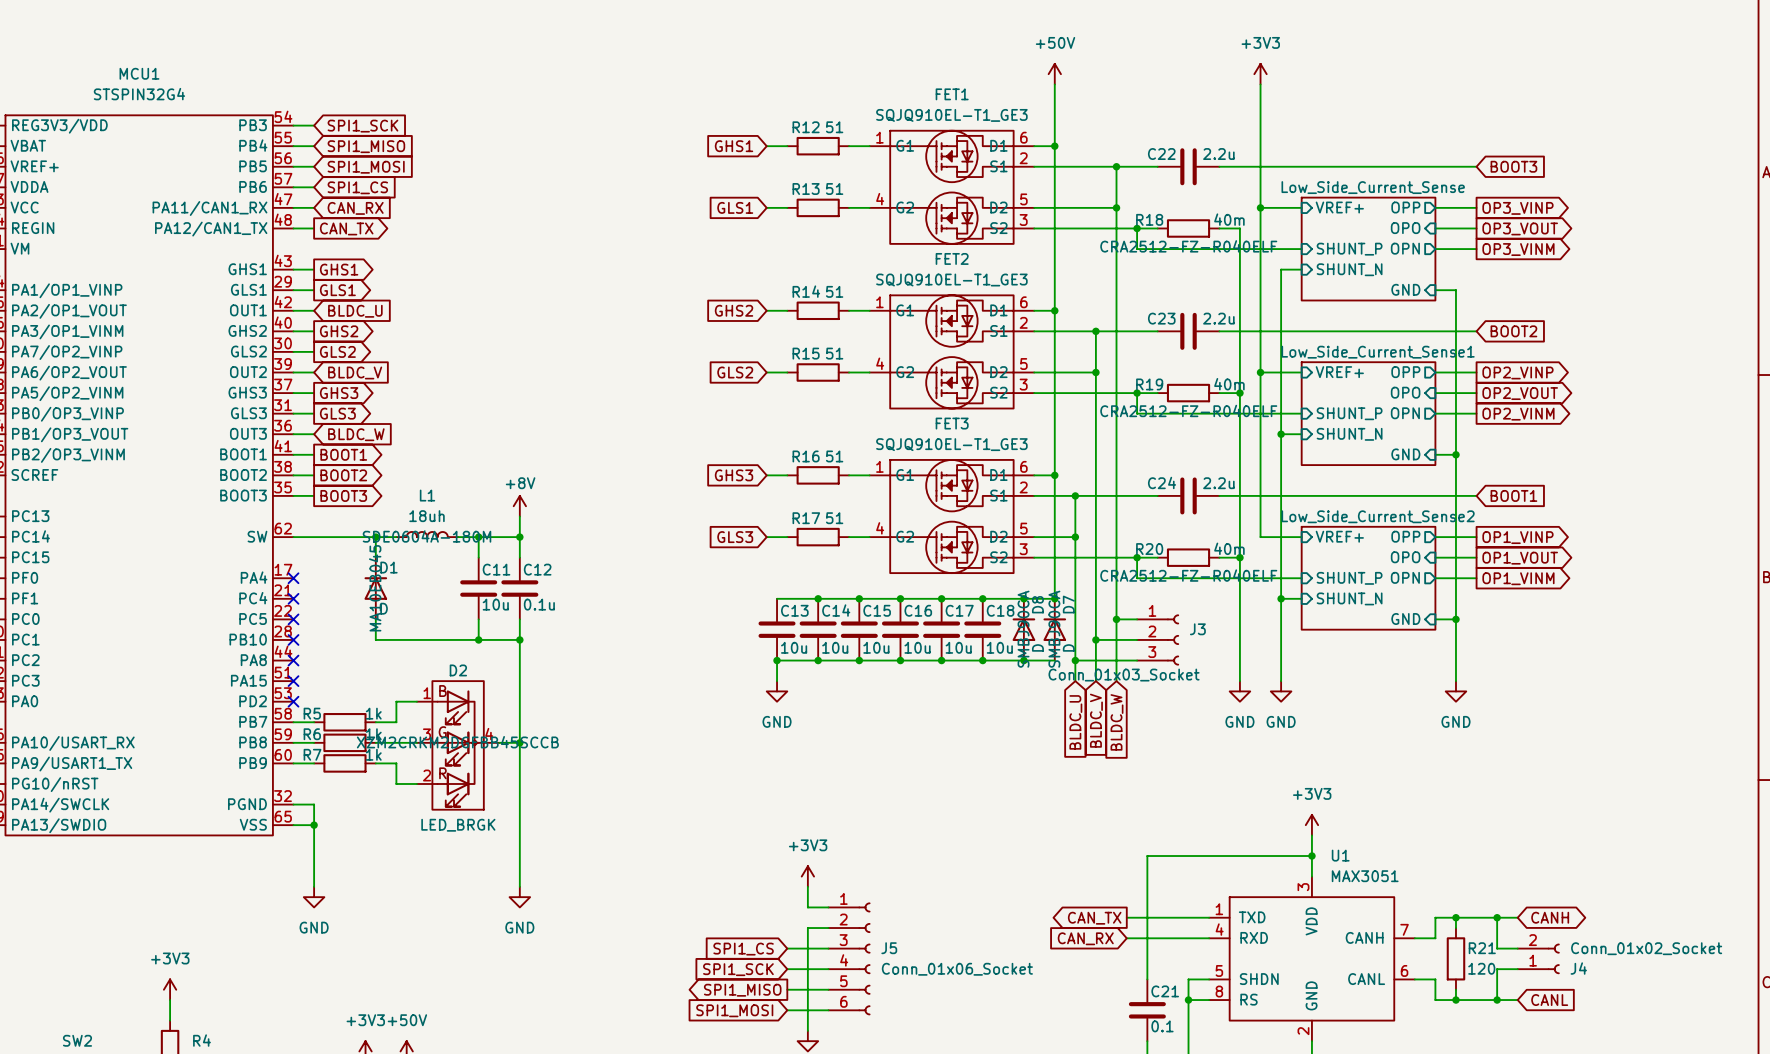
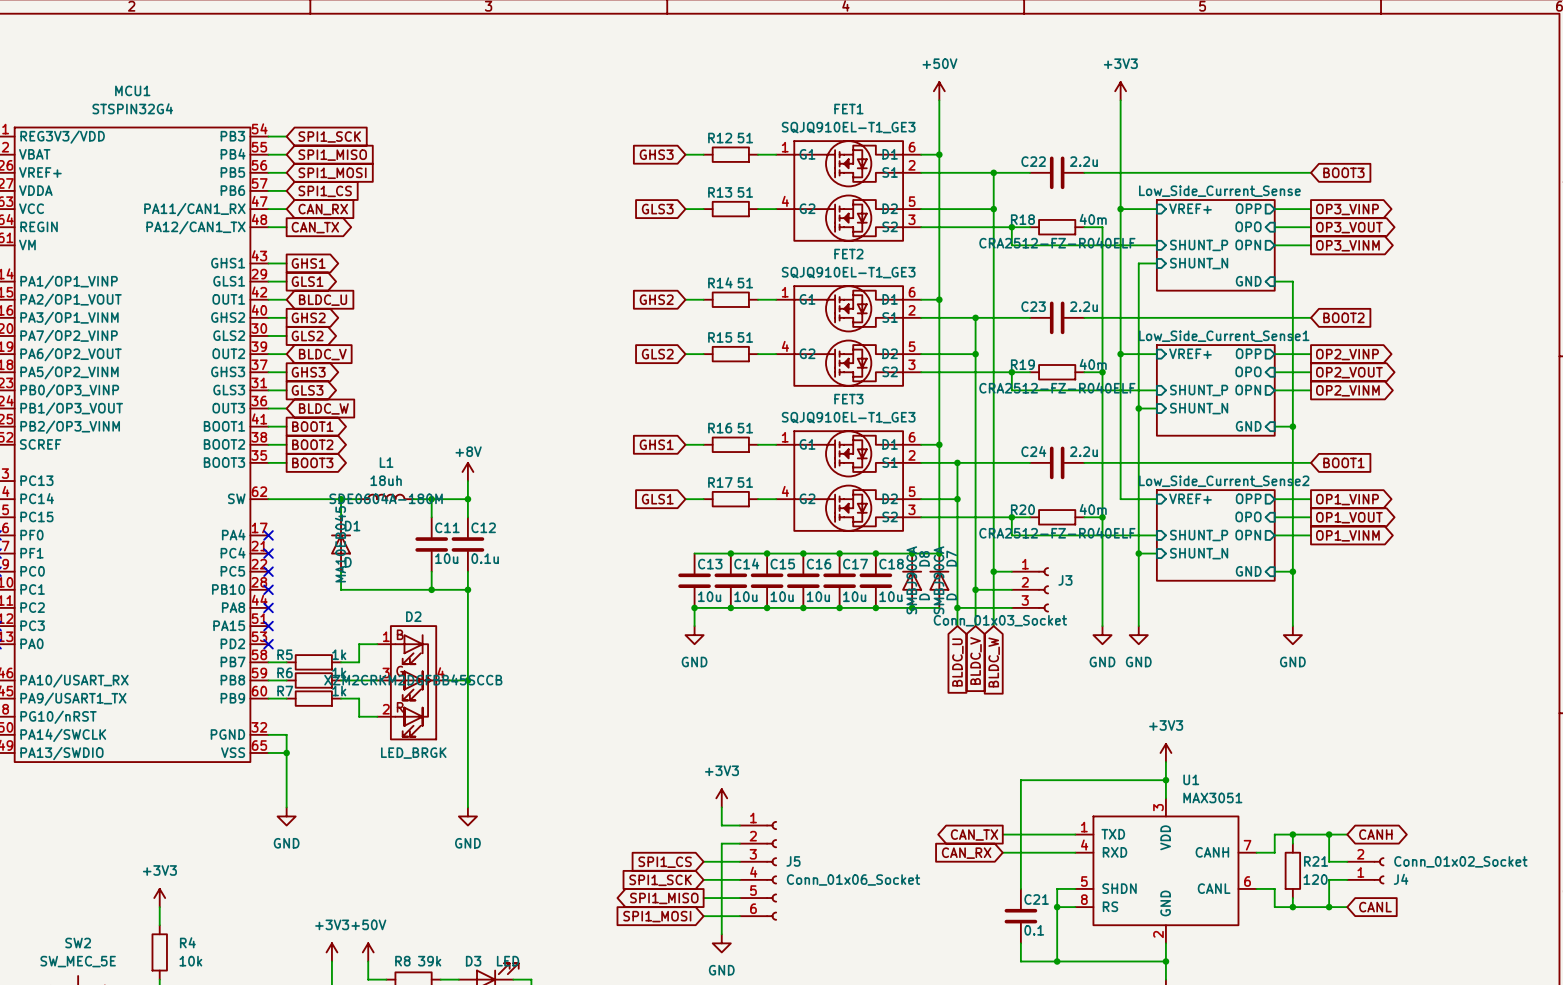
global label: GHS1 (734, 146) -> GHS3 (656, 154)
global label: GLS1 (735, 207) -> GLS3 (657, 209)
global label: GHS3 (734, 475) -> GHS1 (656, 444)
global label: GLS3 (735, 537) -> GLS1 (657, 499)

